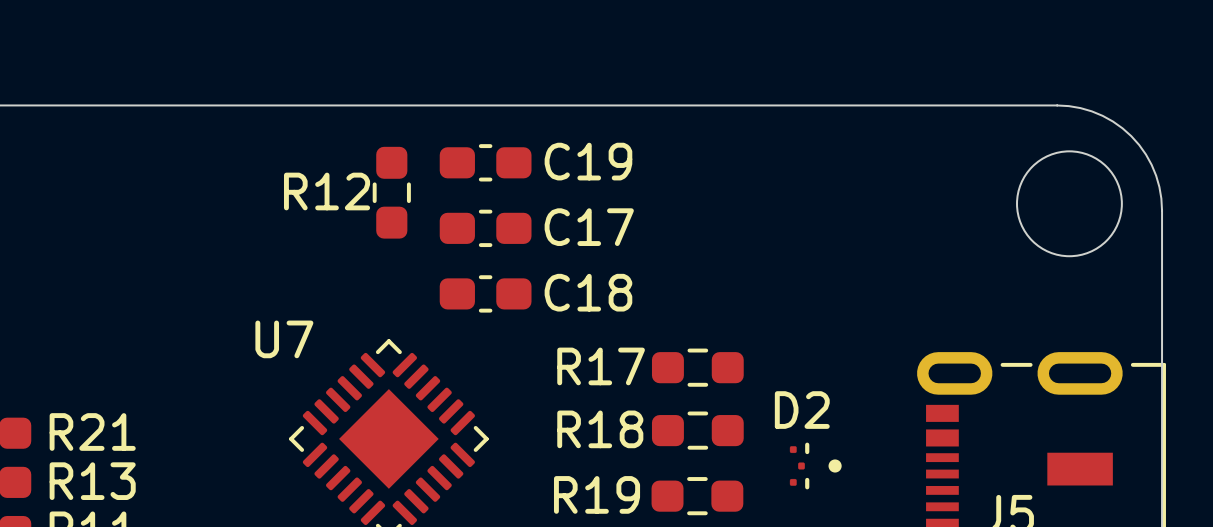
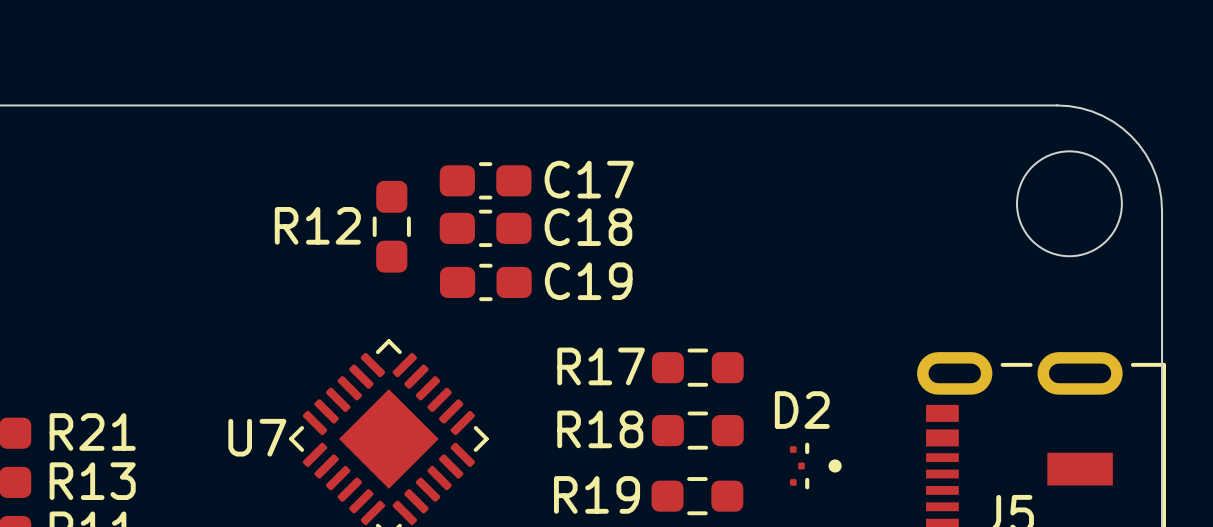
C19 position: (485, 162) -> (485, 282)
C17: none -> (485, 180)
R12 name position: R12 (327, 191) -> R12 (317, 225)
R12 position: (391, 192) -> (391, 226)
C17 name: C17 (589, 227) -> C18 (588, 227)
C18: (485, 293) -> none
U7 name position: U7 (284, 339) -> U7 (257, 437)

